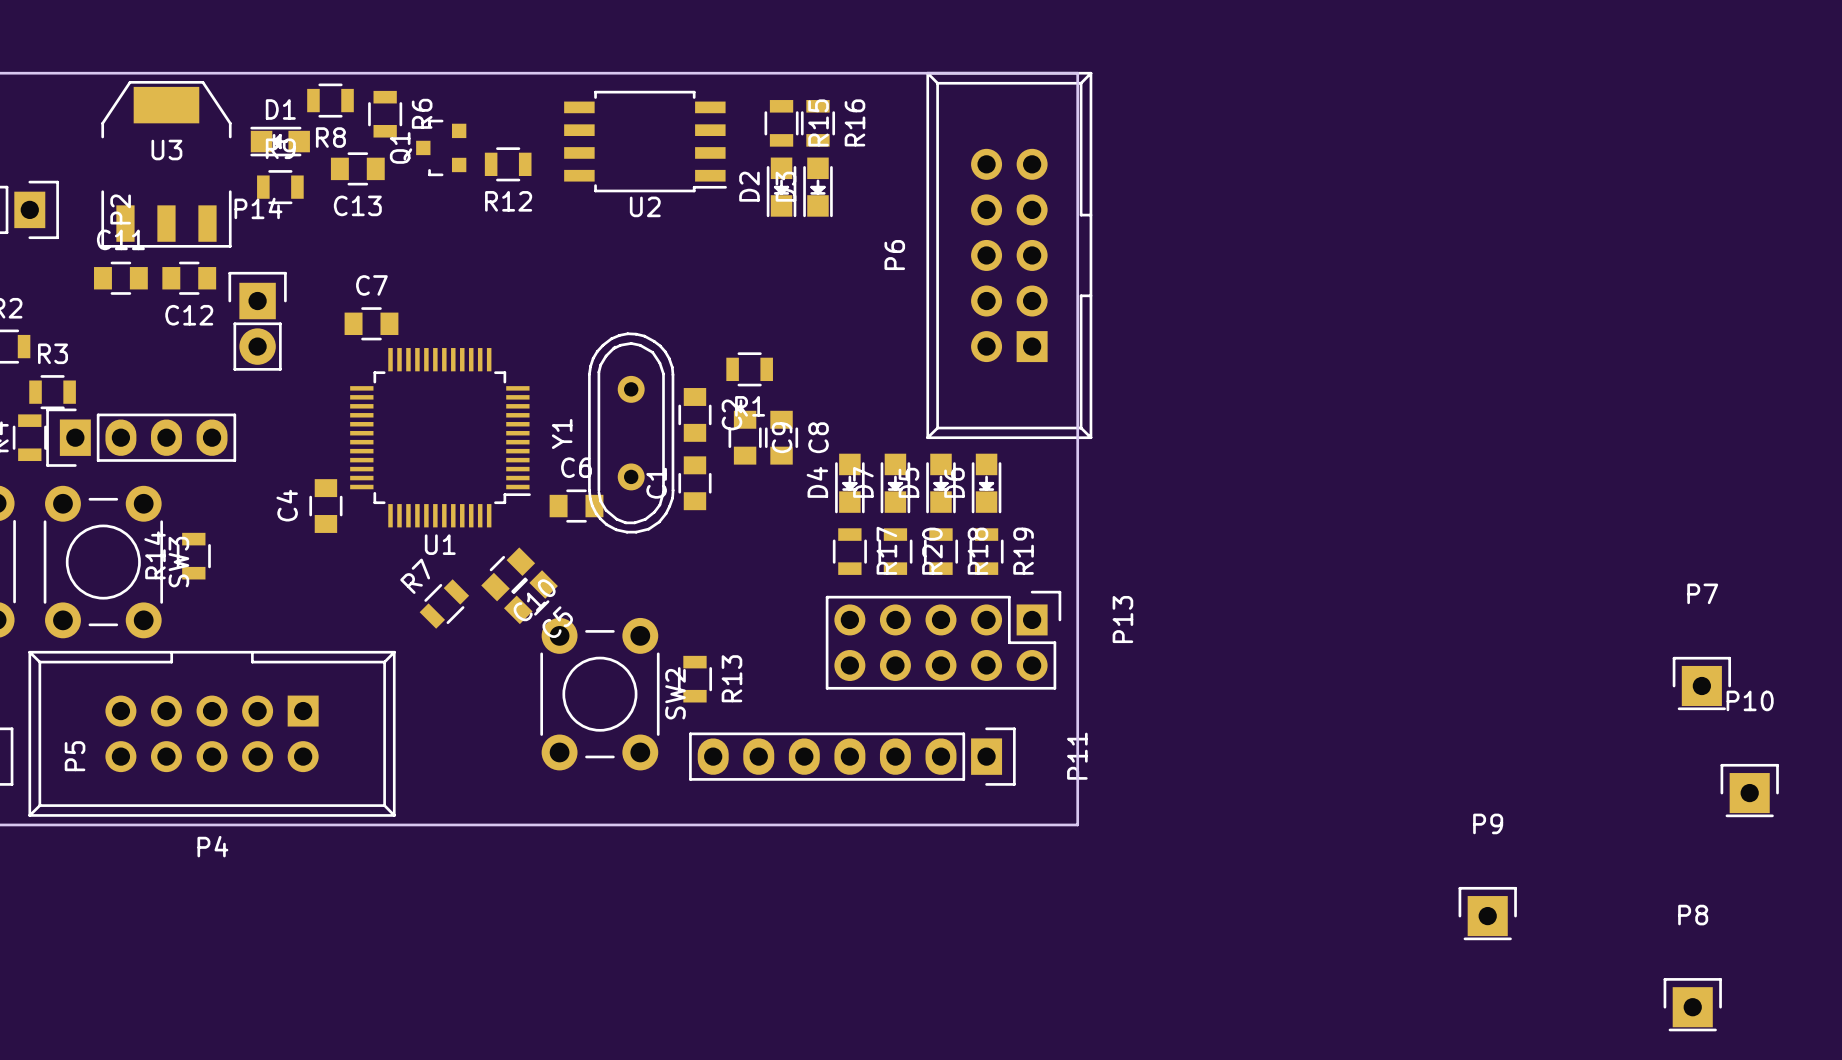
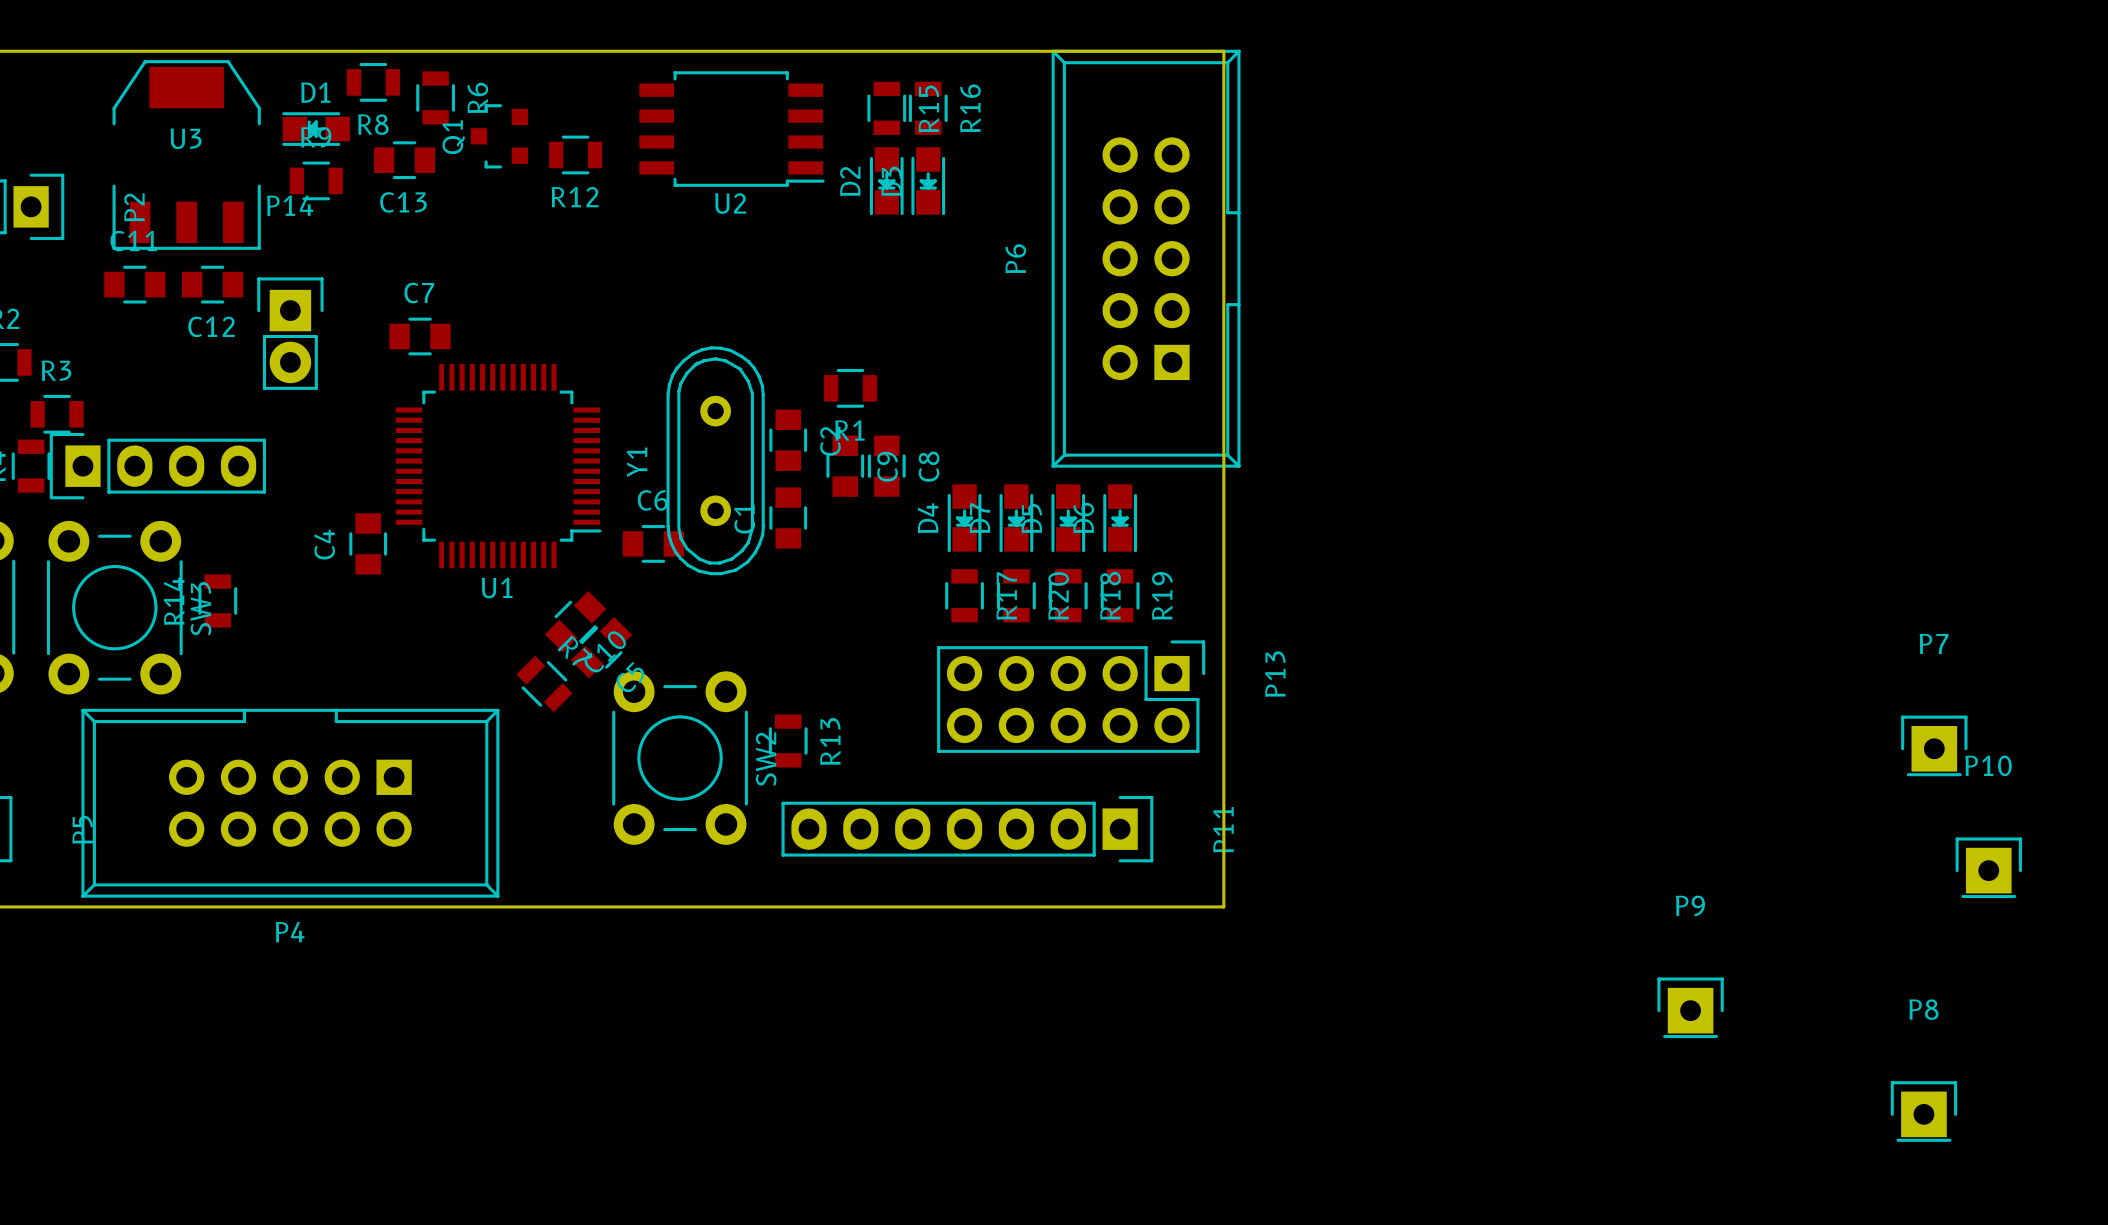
R7 rotation: 0° (444, 603) -> 90° clockwise (544, 683)
R7 position: (444, 603) -> (544, 683)
P4 position: (212, 733) -> (290, 803)

